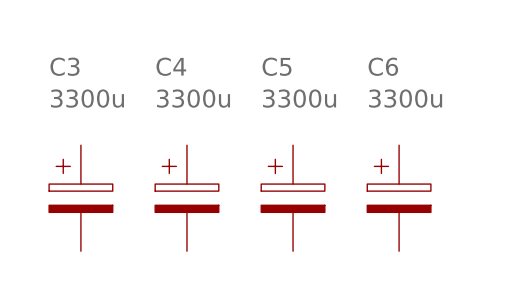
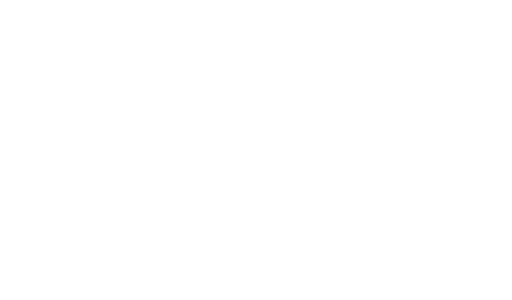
C3: 3300u (80, 198) -> none
C4: 3300u (186, 198) -> none
C5: 3300u (293, 198) -> none
C6: 3300u (399, 198) -> none

